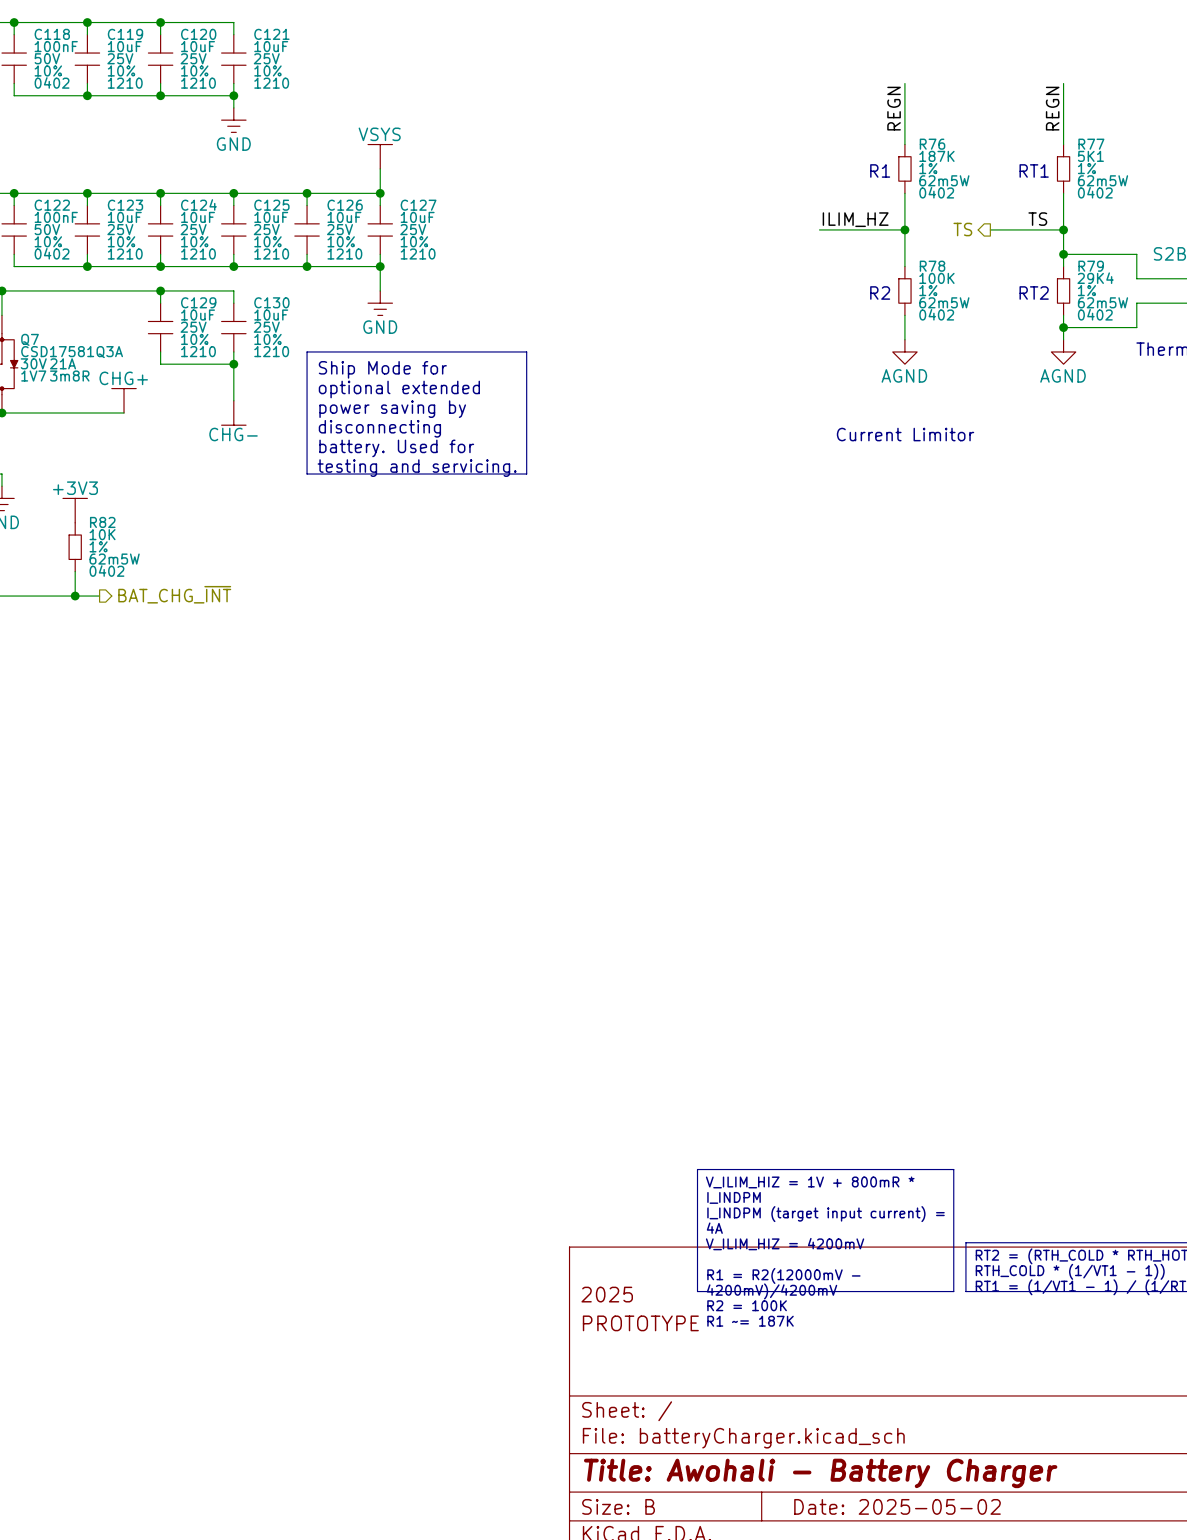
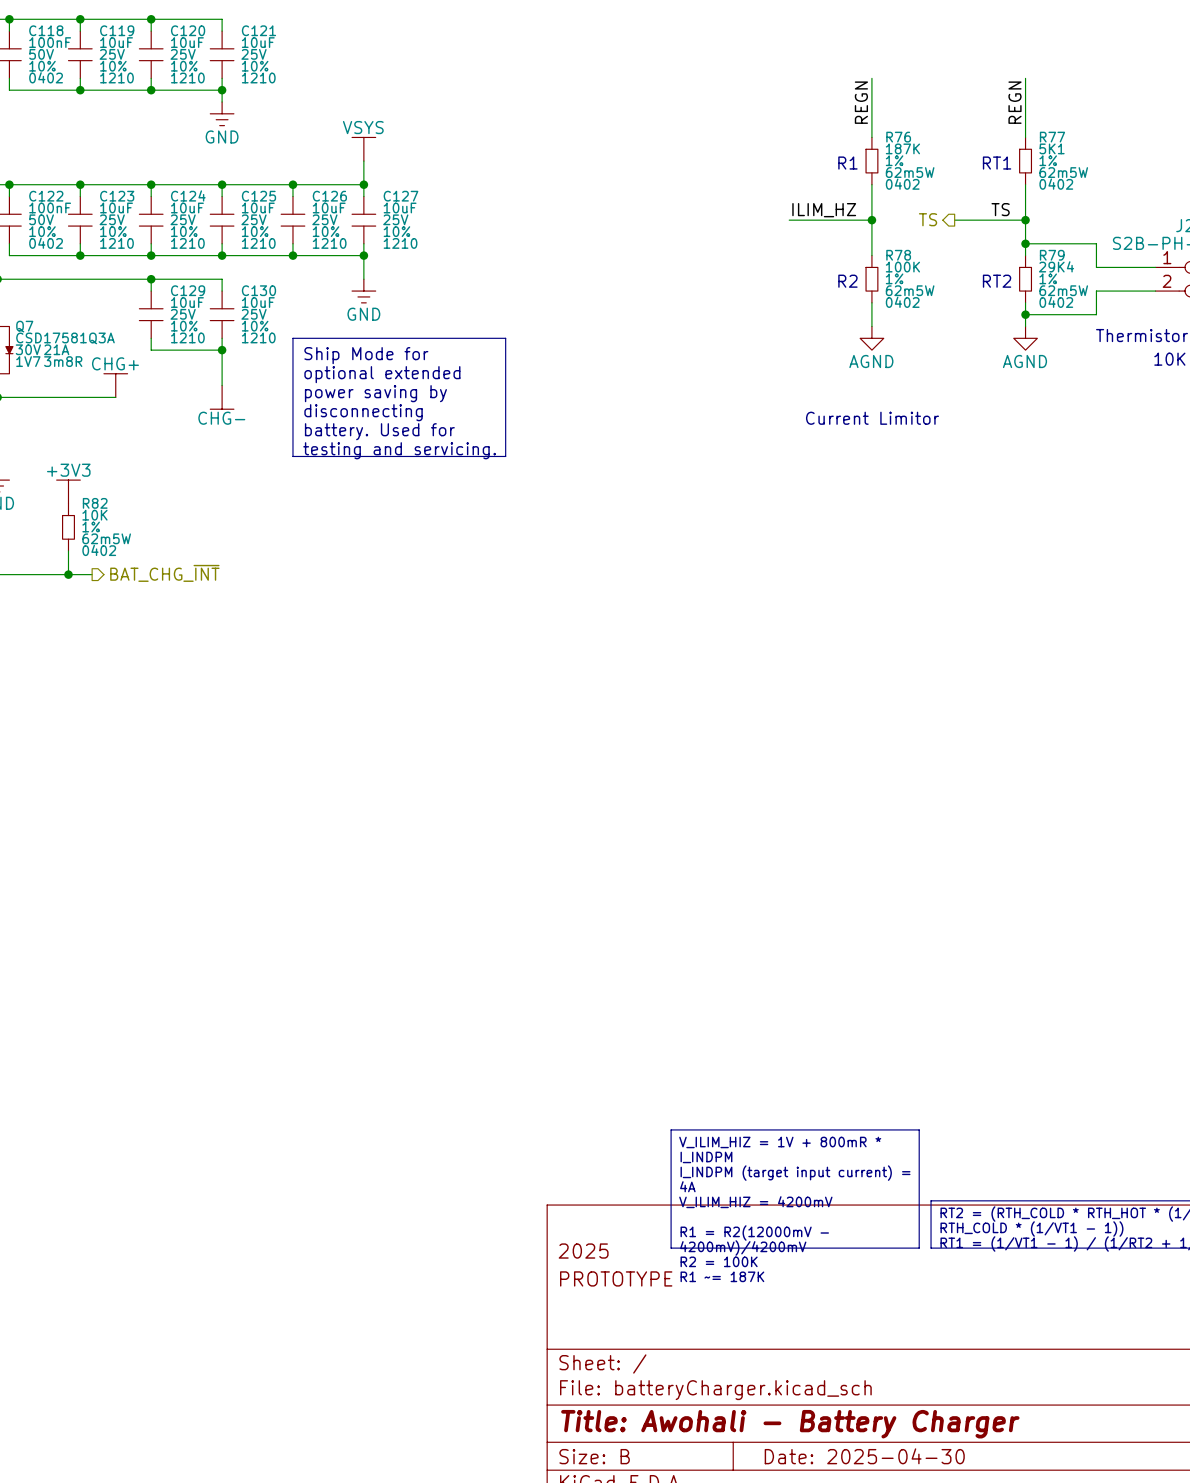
title block: Date: 2025-05-02 (897, 1506) -> Date: 2025-04-30 (864, 1456)

